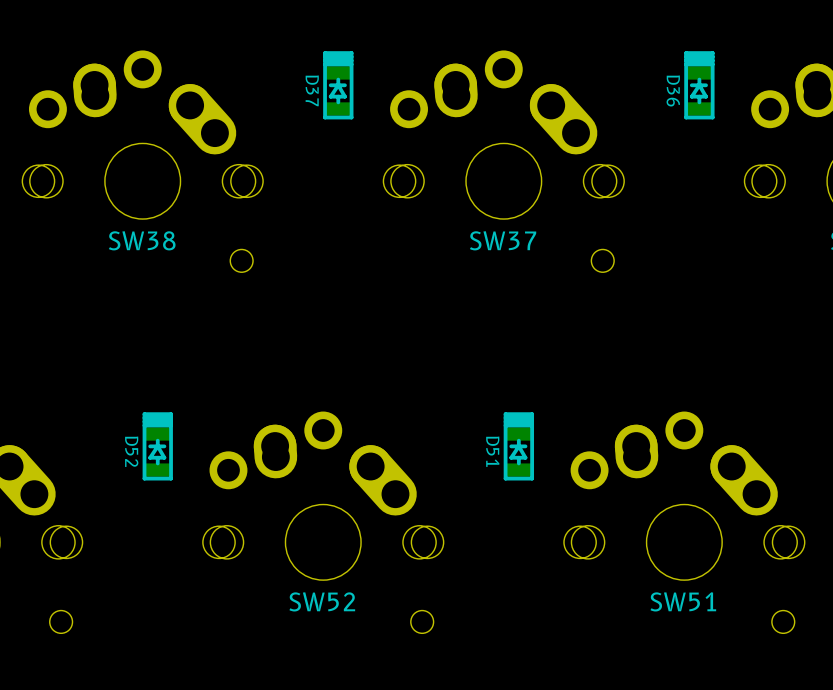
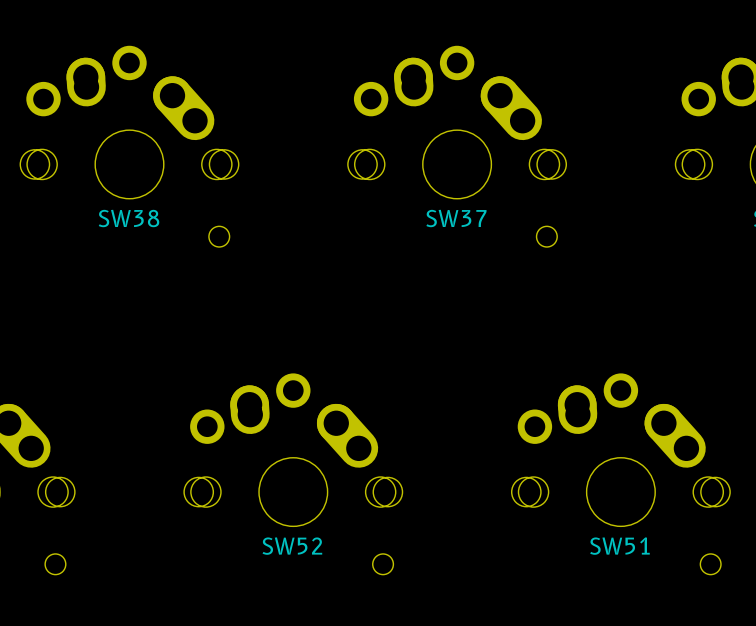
D37: (338, 85) -> none
D36: (699, 85) -> none
D52: (157, 446) -> none
D51: (518, 446) -> none

